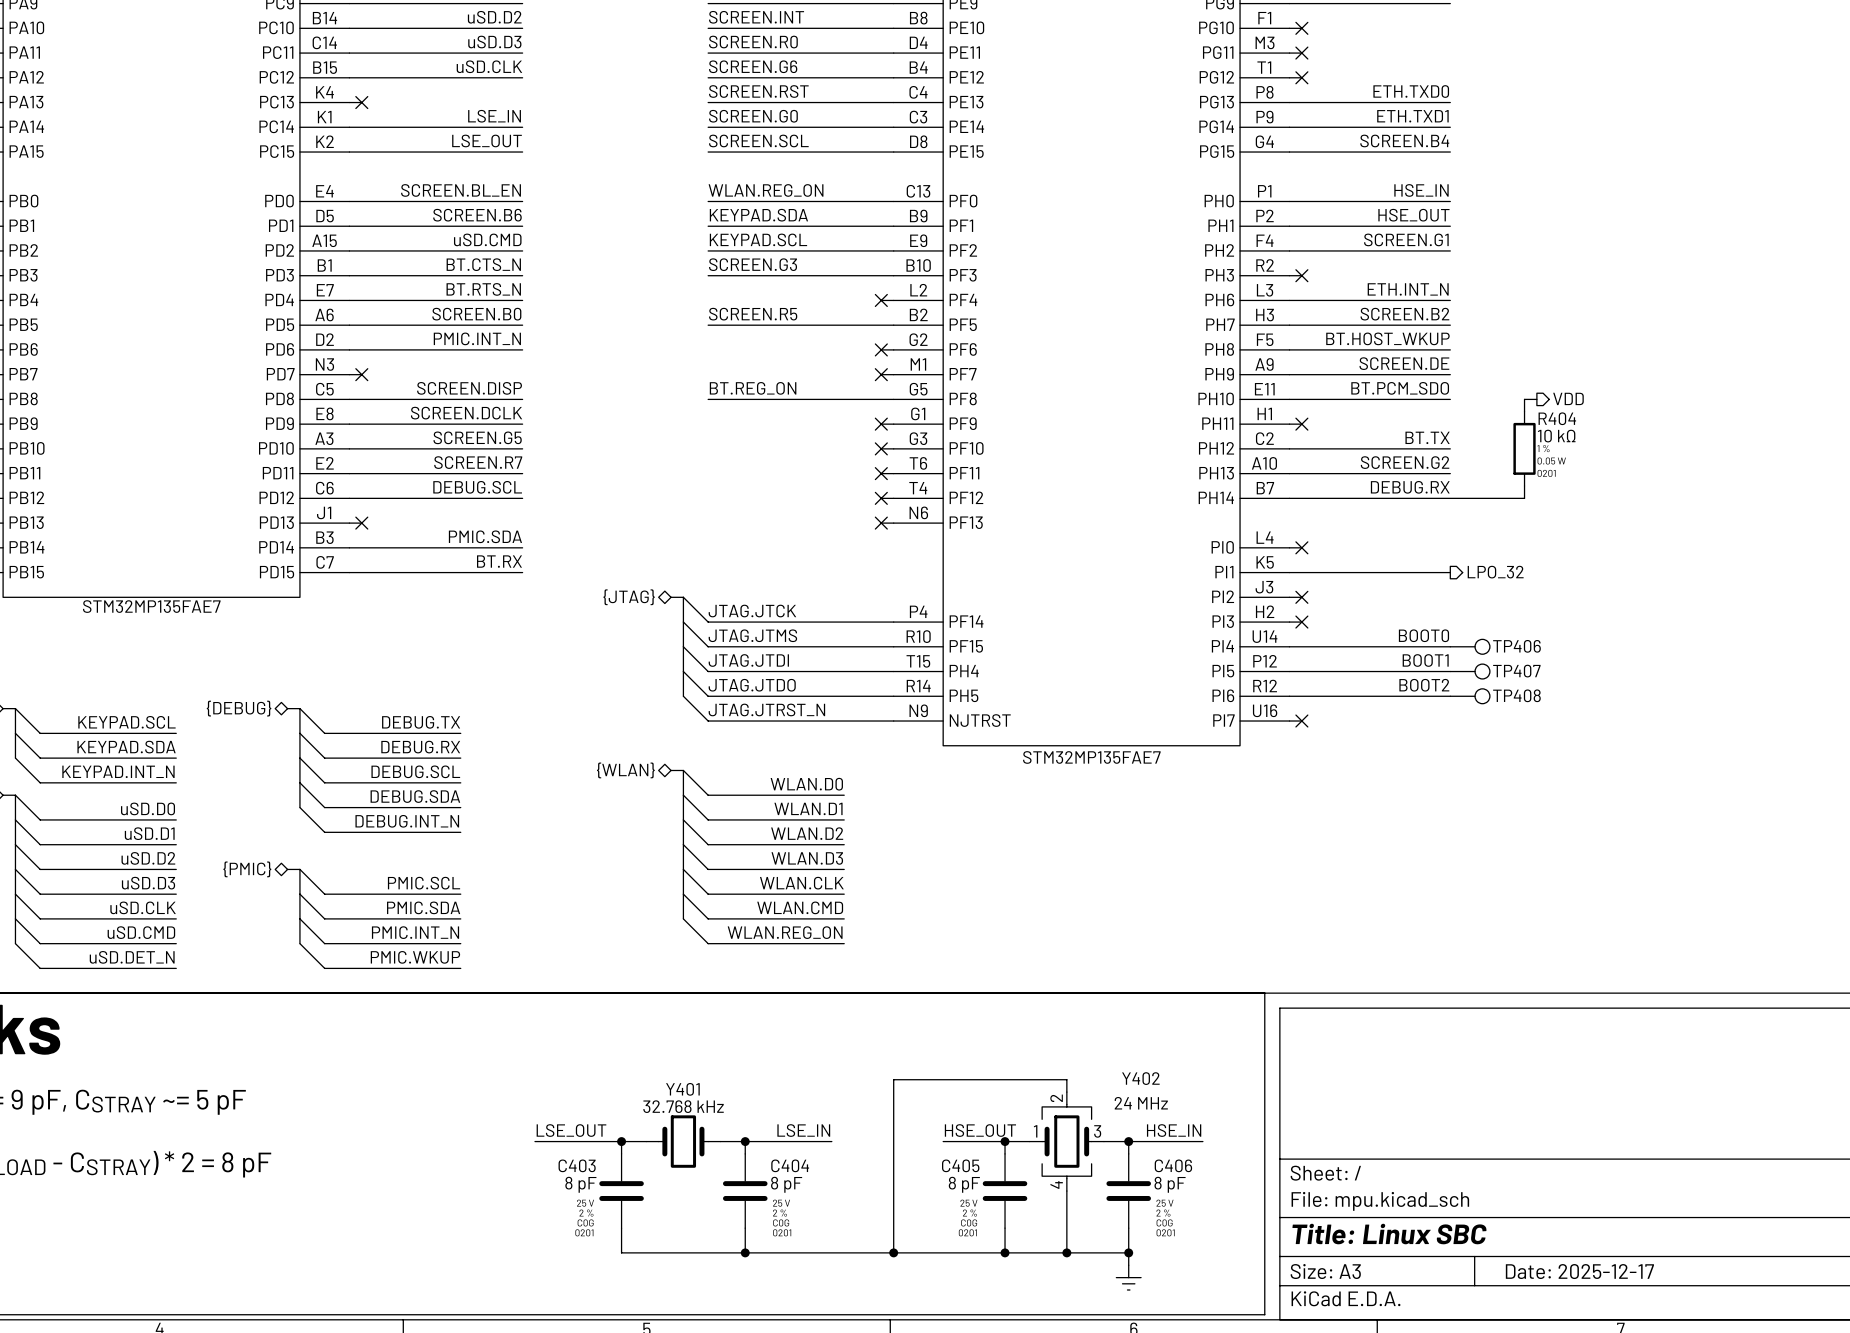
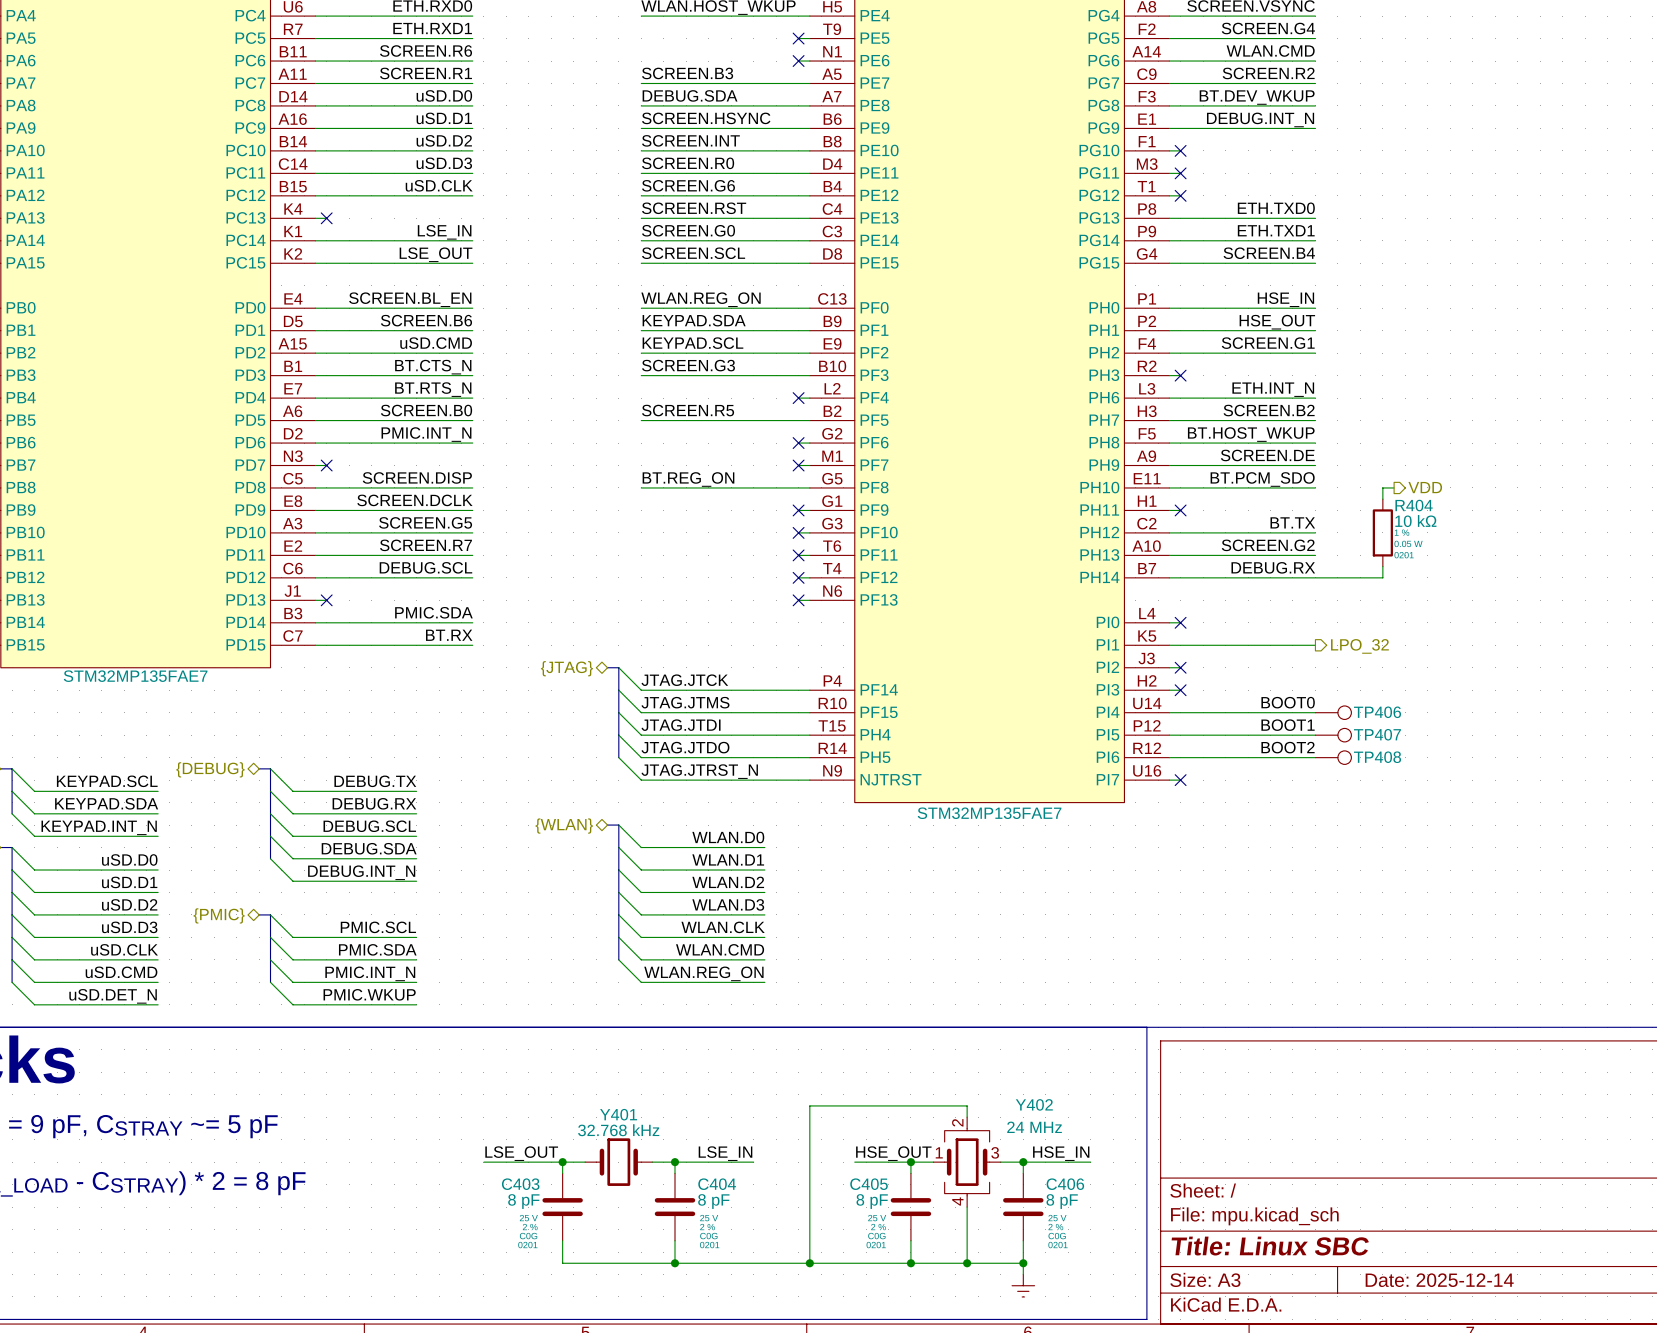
title block: Date: 2025-12-17 (1579, 1271) -> Date: 2025-12-14 (1439, 1280)

